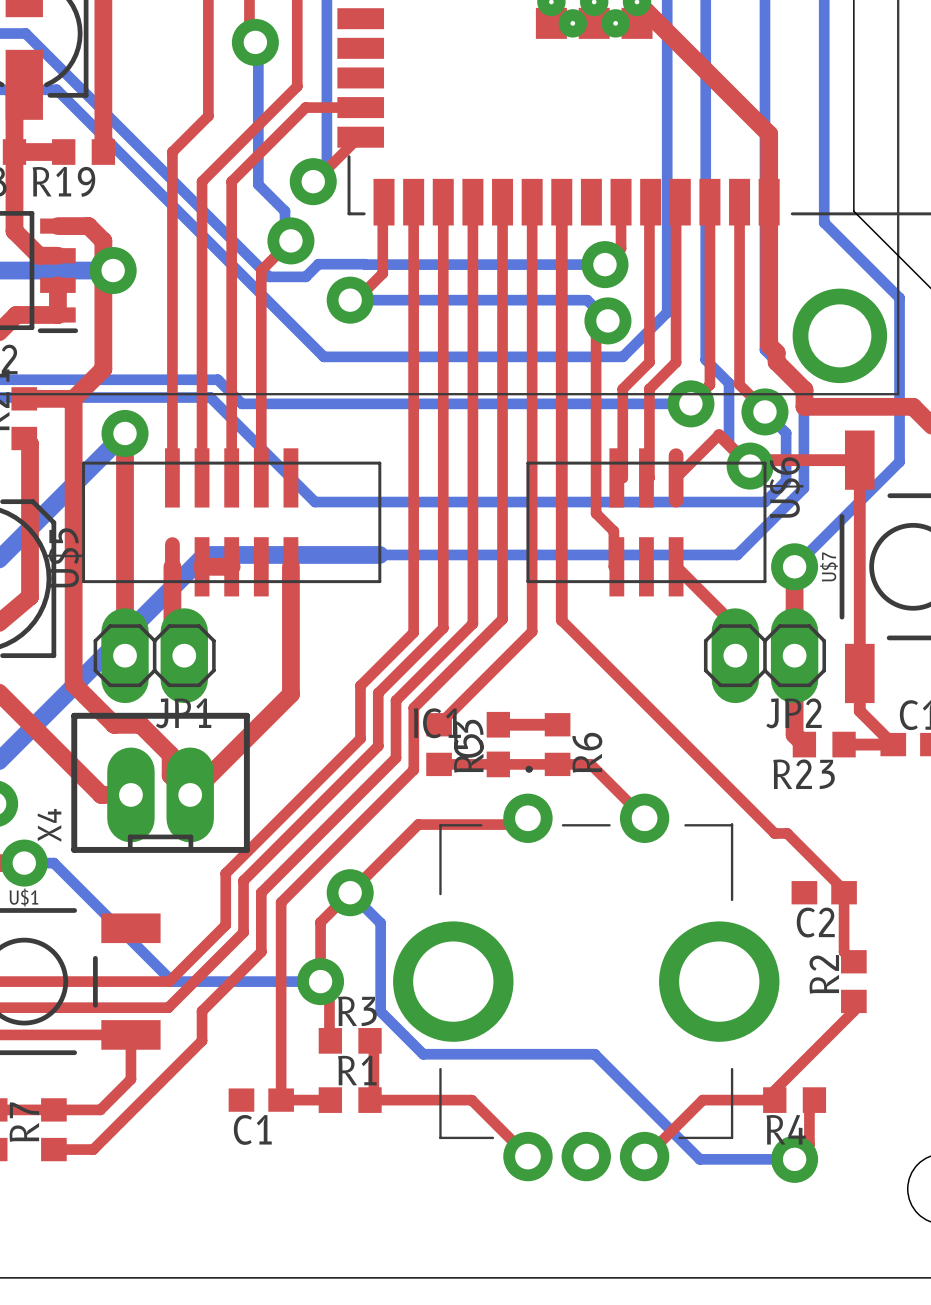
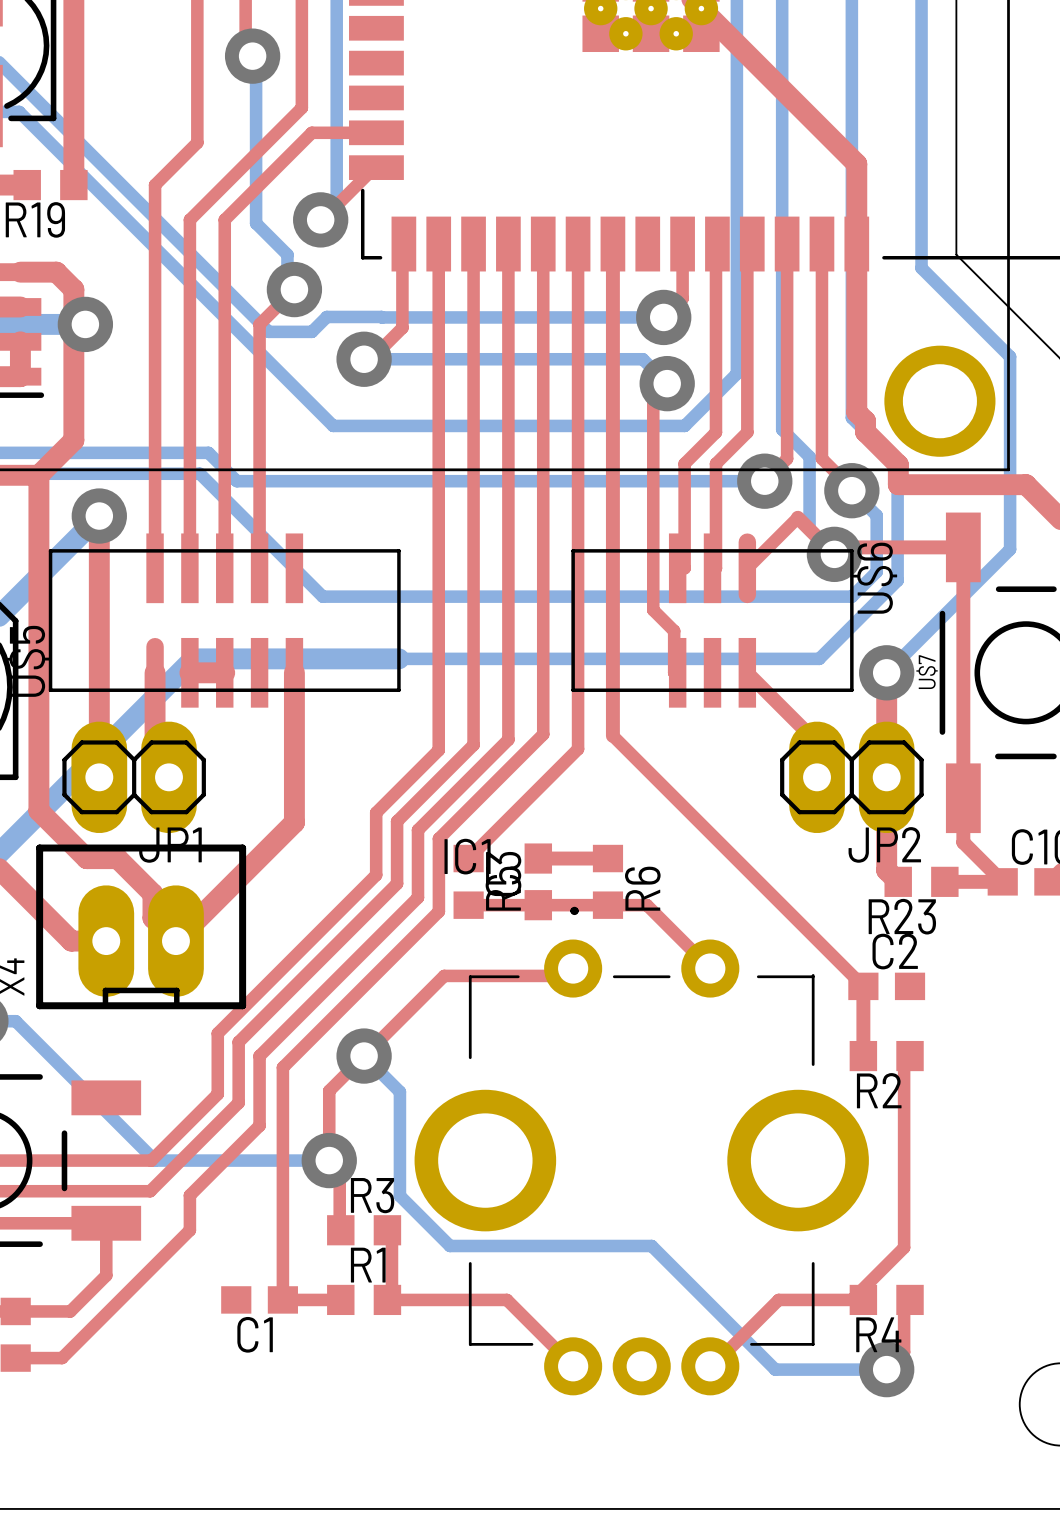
top track: (774, 833) (787, 833) (844, 890) (844, 951) (853, 961) -> (863, 986) (863, 1056)
C2 position: (824, 892) -> (886, 986)
C2 name position: C2 (815, 922) -> C2 (895, 951)
R2 name position: R2 (824, 974) -> R2 (879, 1090)
R2 rotation: 0° (853, 981) -> 90° clockwise (886, 1056)
R2 position: (853, 981) -> (886, 1056)
top track: (853, 1001) (853, 1011) (809, 1055) -> (910, 1056) (904, 1059) (904, 1247)

